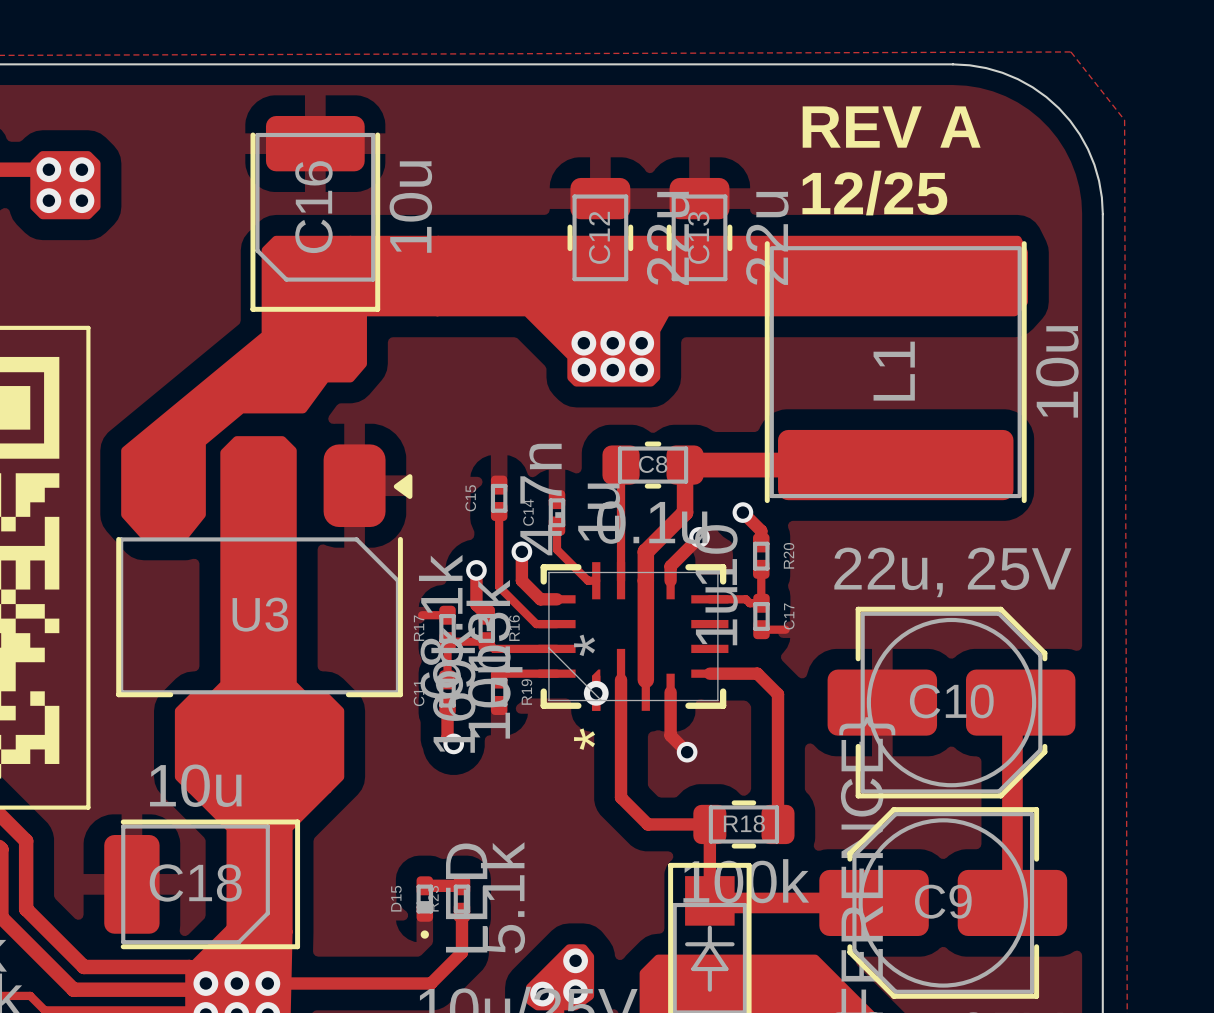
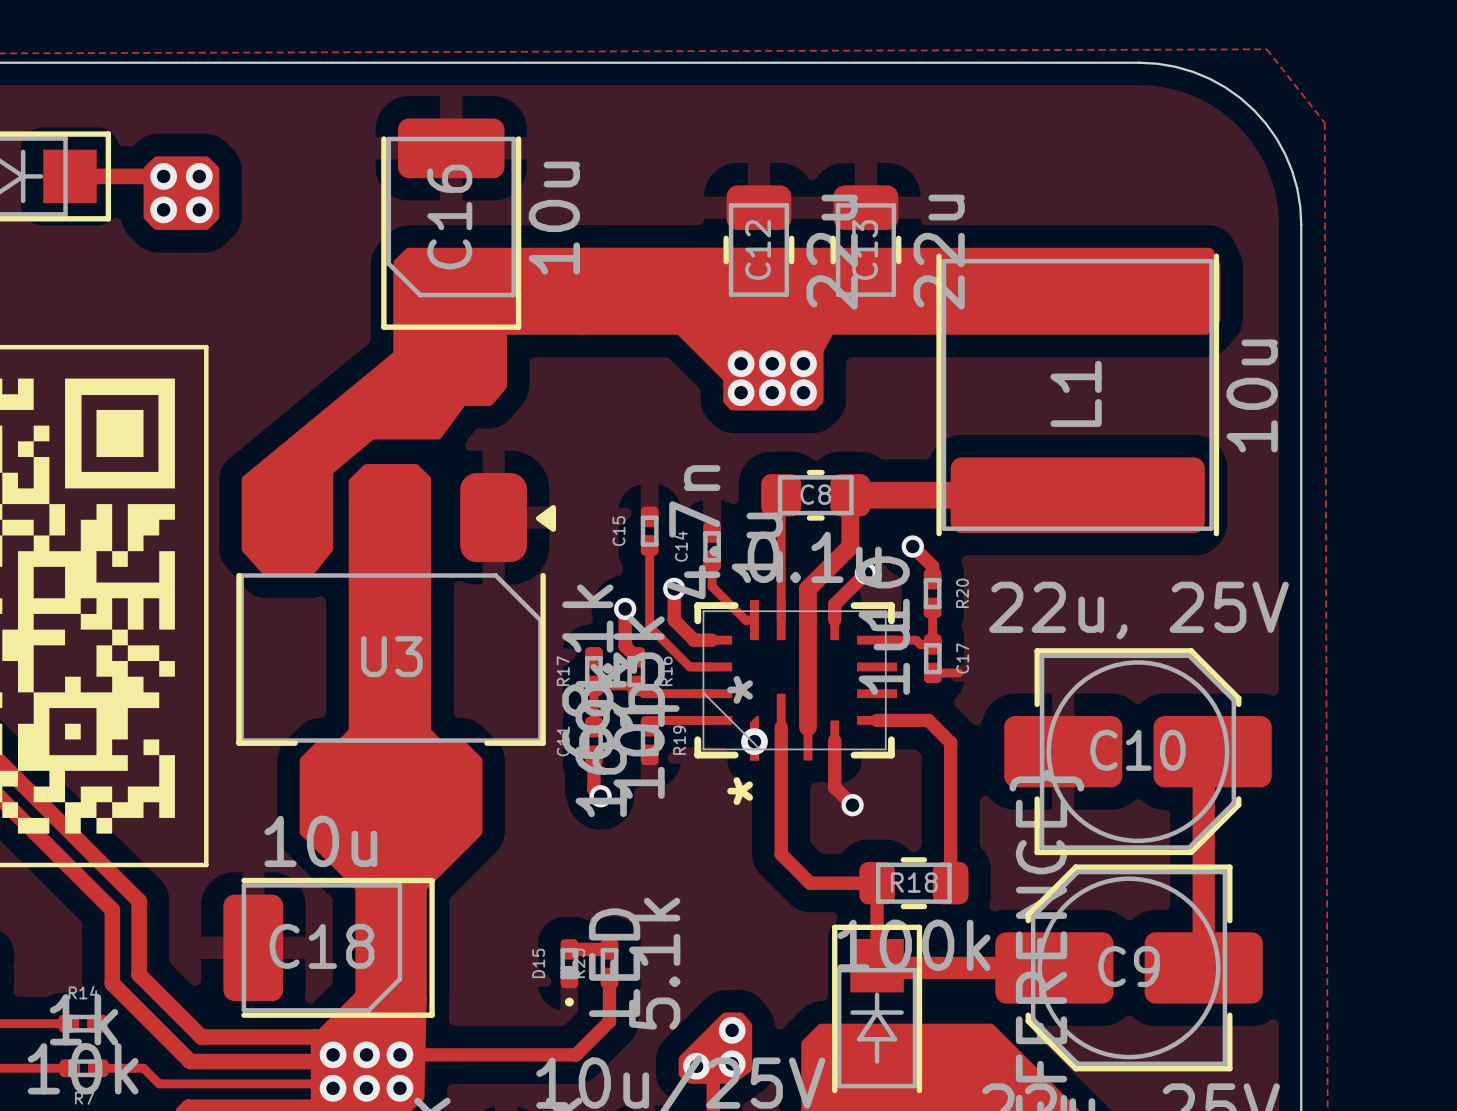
text: REV A (891, 127) -> none
text: 12/25 (874, 193) -> none
track: (422, 615) (447, 615) -> none

